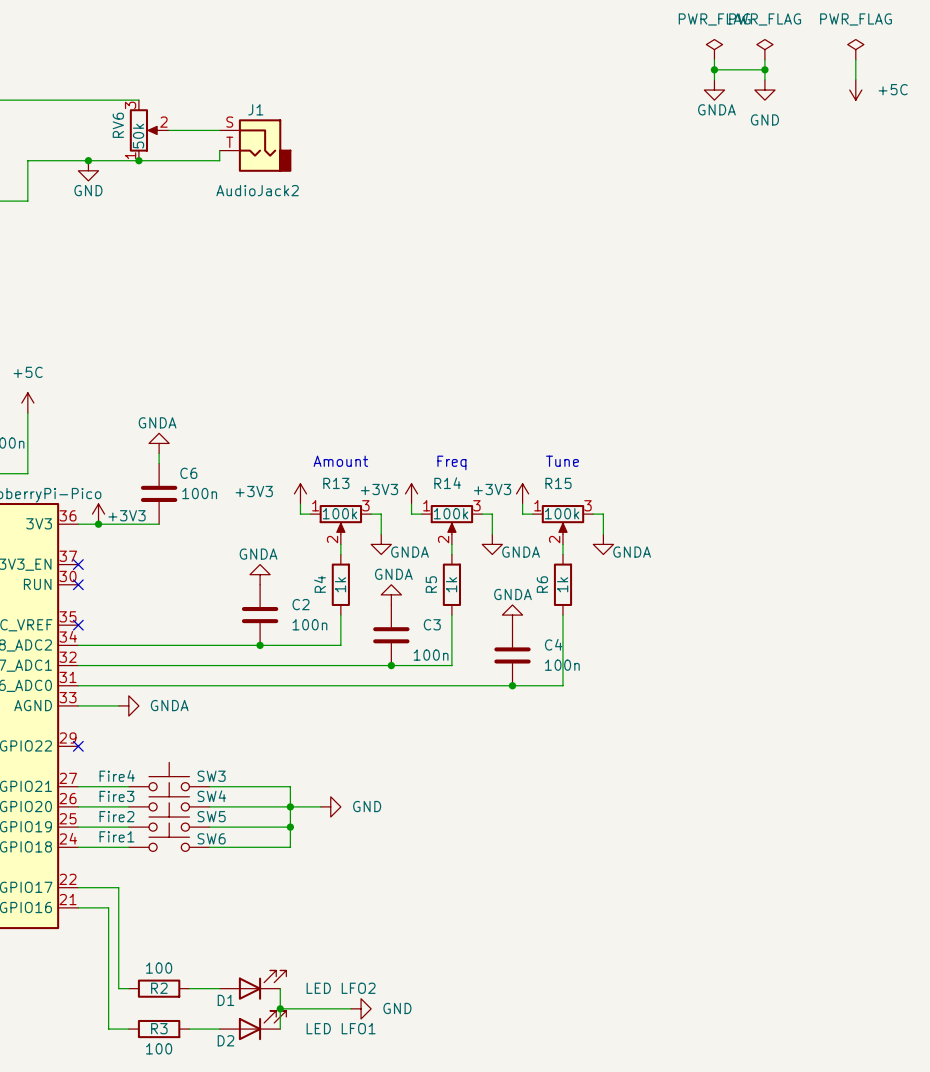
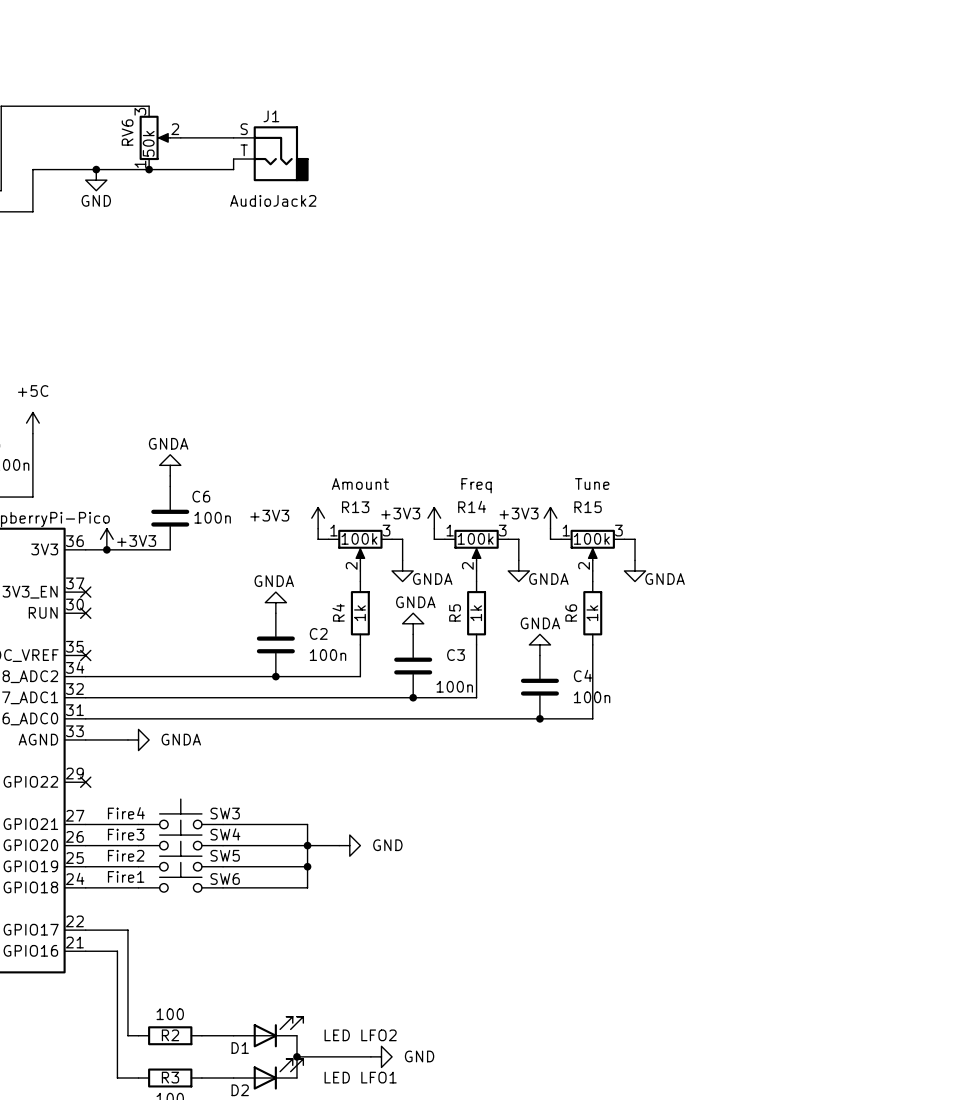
power symbol: PWR_FLAG (714, 49) -> none
power symbol: PWR_FLAG (764, 49) -> none
power symbol: PWR_FLAG (855, 49) -> none
wire: (714, 59) (714, 79) -> none
wire: (764, 59) (764, 79) -> none
wire: (855, 59) (855, 79) -> none
wire: (714, 69) (764, 69) -> none
junction: (714, 69) -> none
junction: (764, 69) -> none
power symbol: GNDA (714, 90) -> none
power symbol: GND (764, 90) -> none
power symbol: +5C (855, 90) -> none

